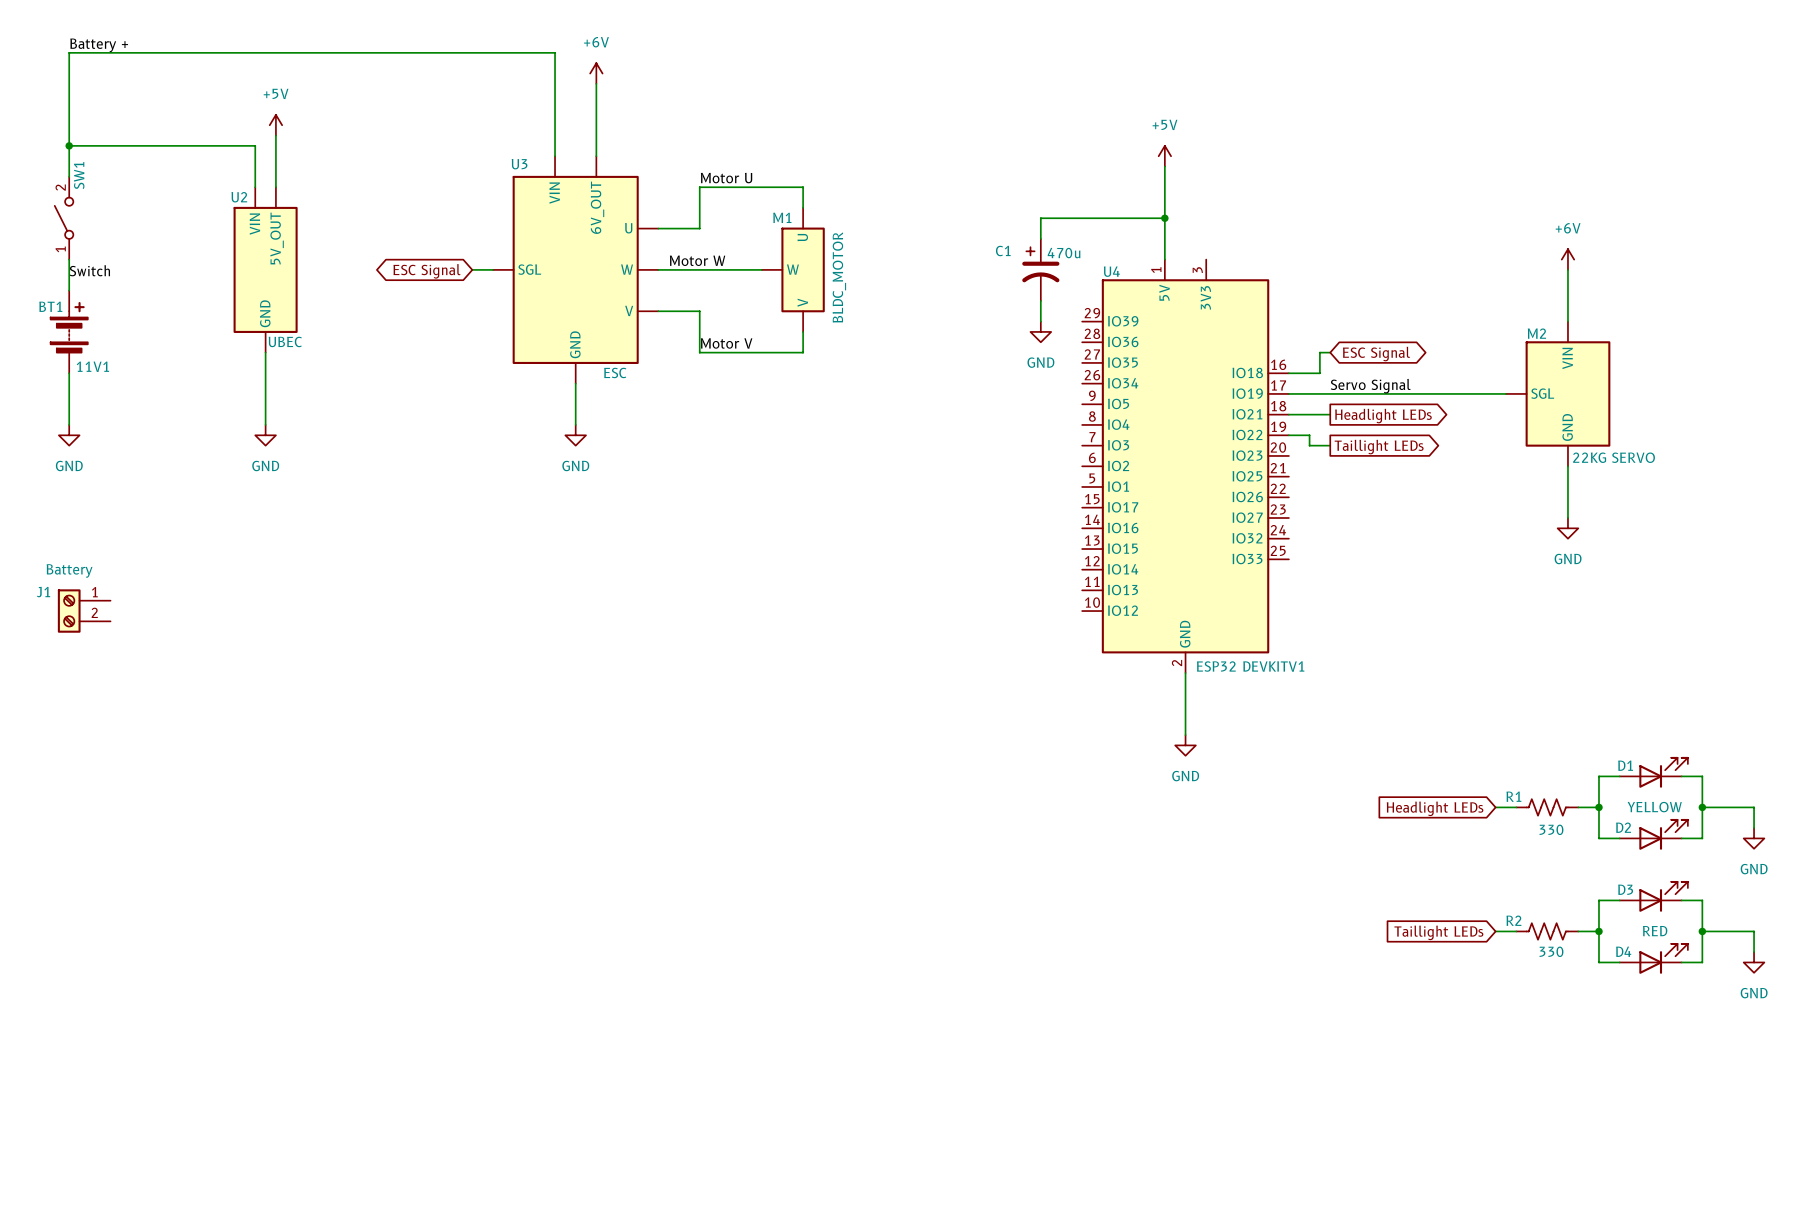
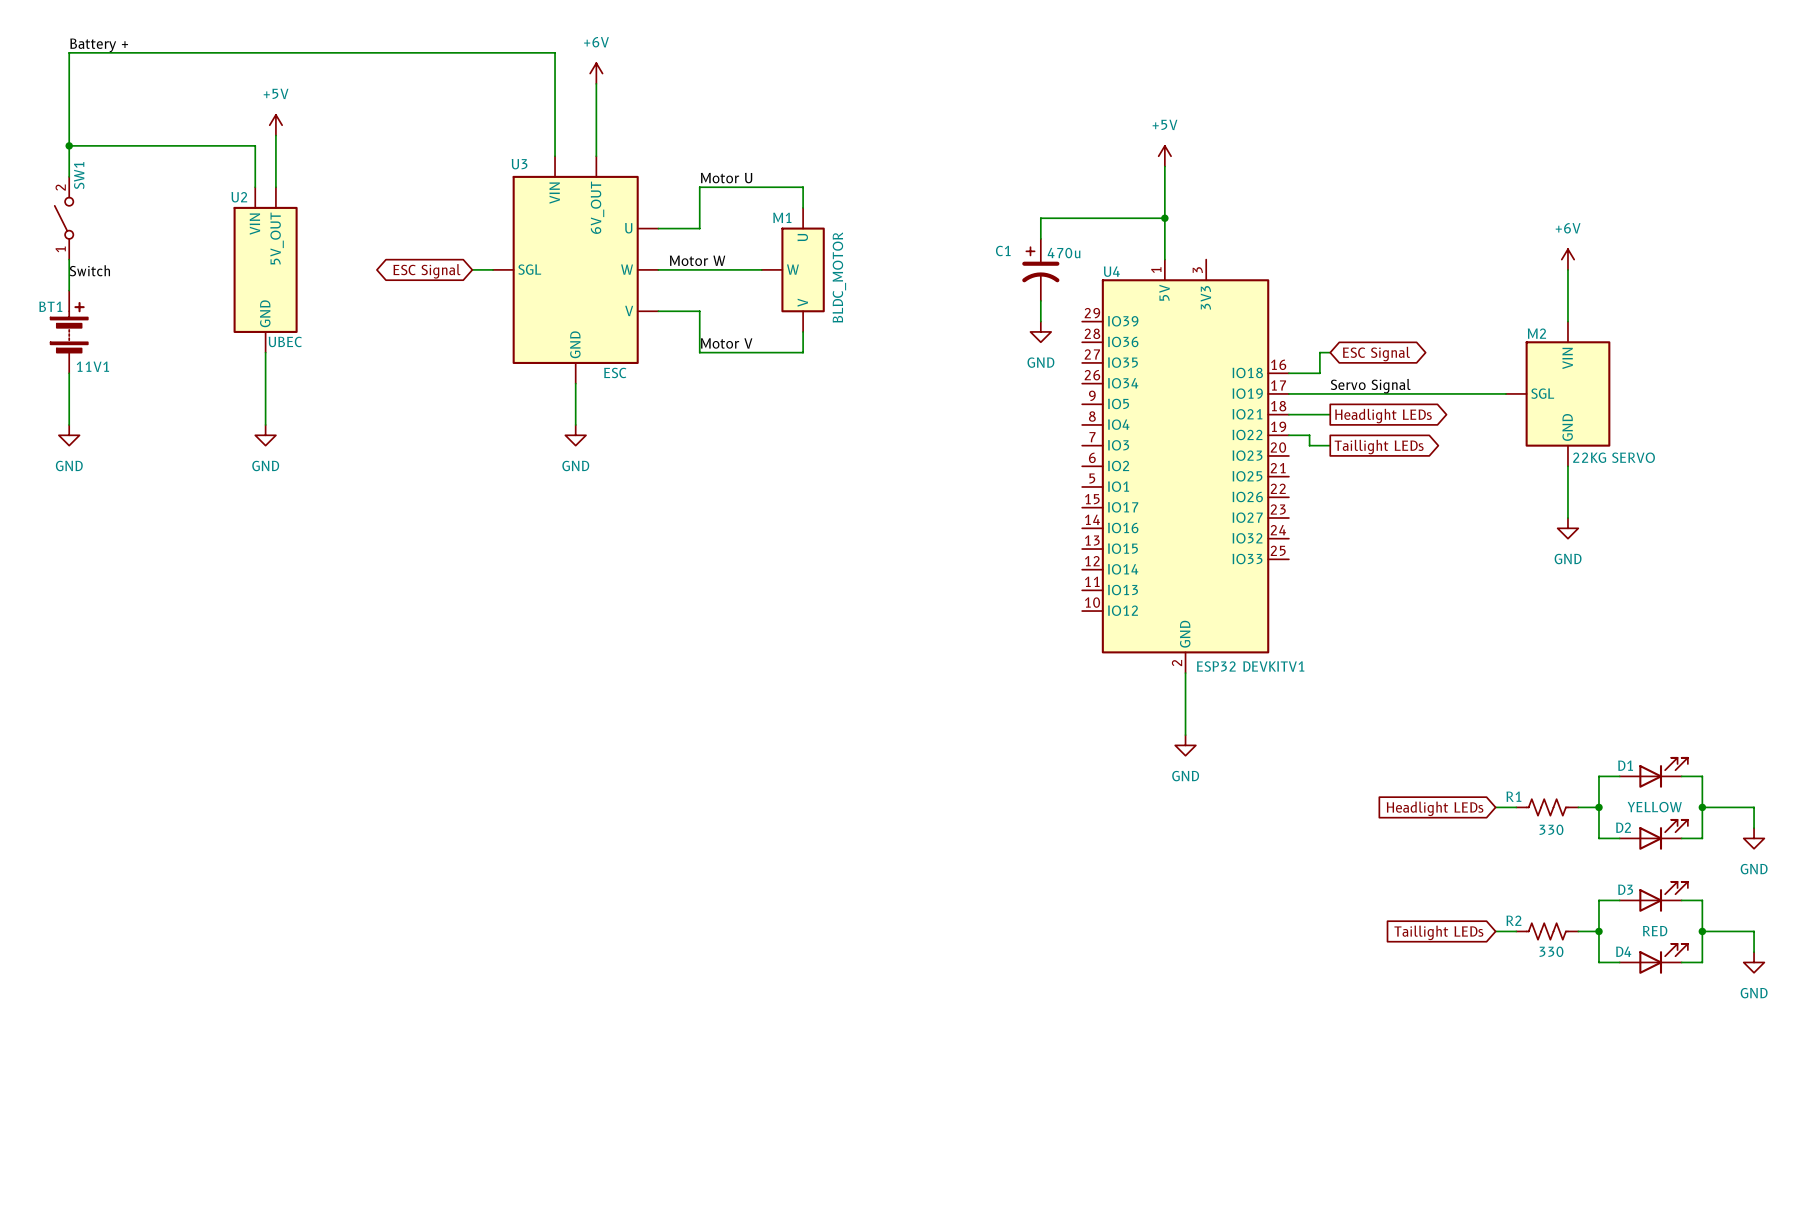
J1: Battery (84, 611) -> none

